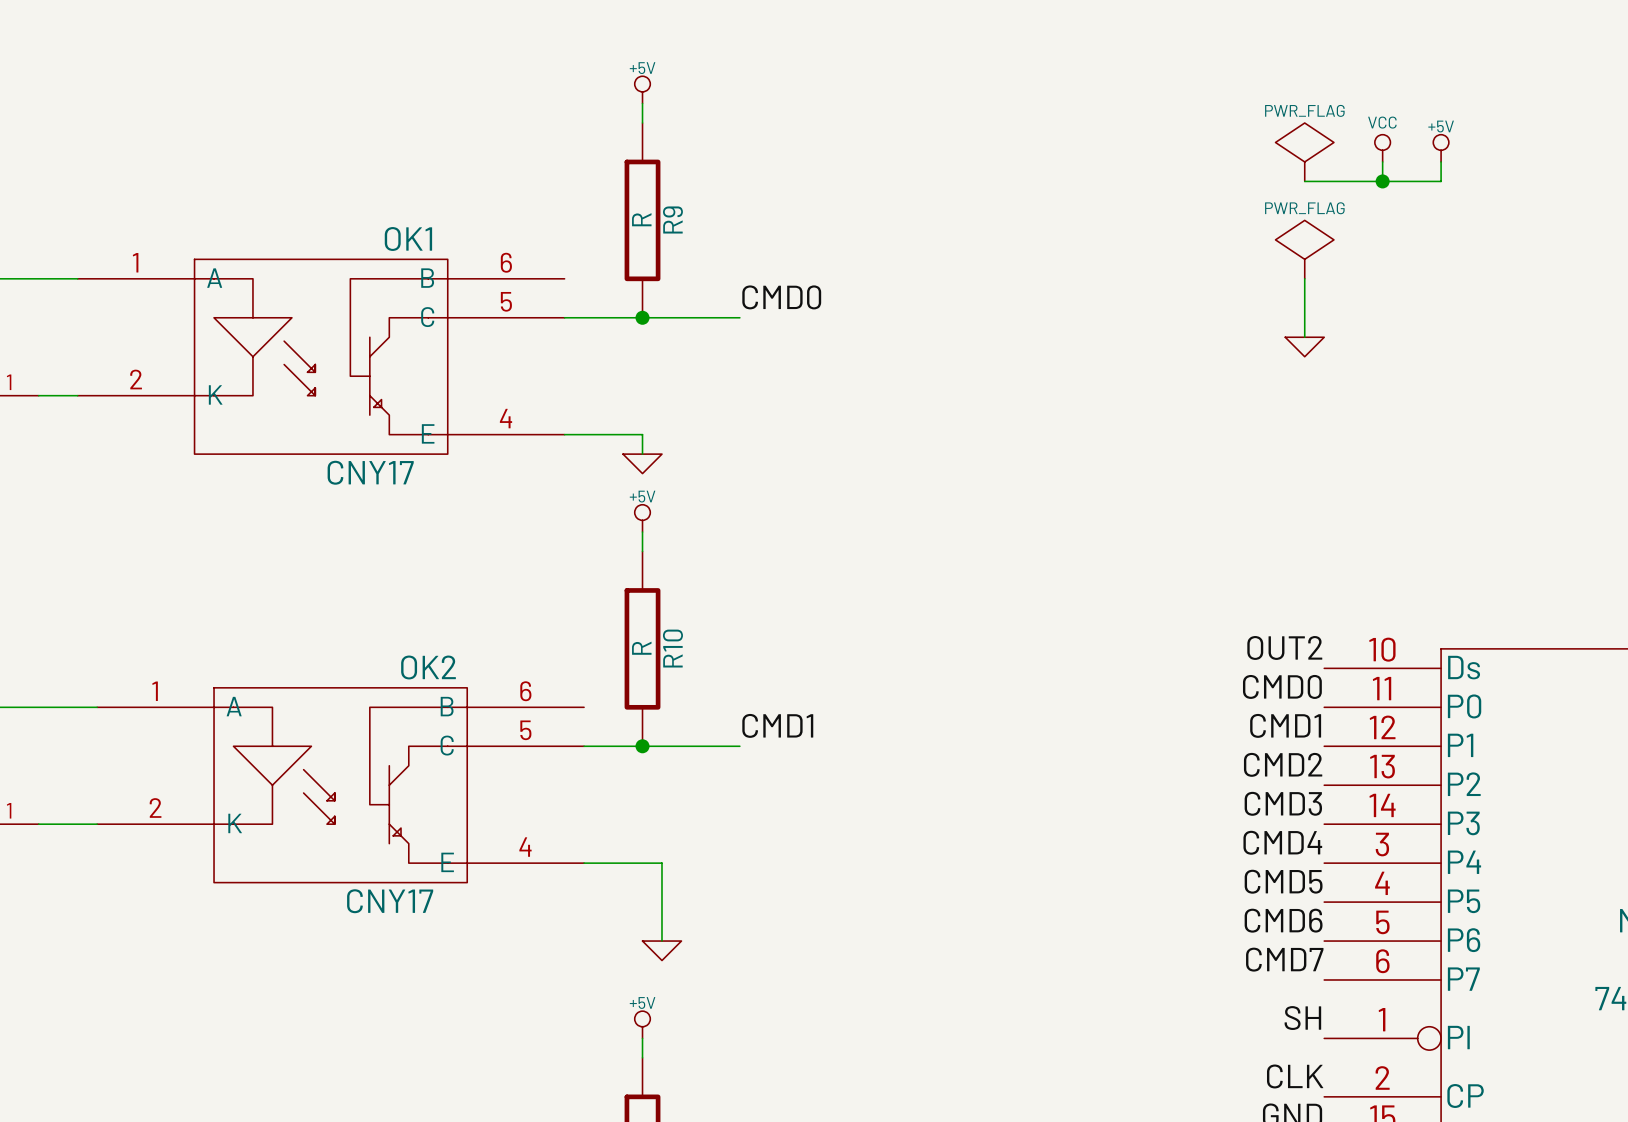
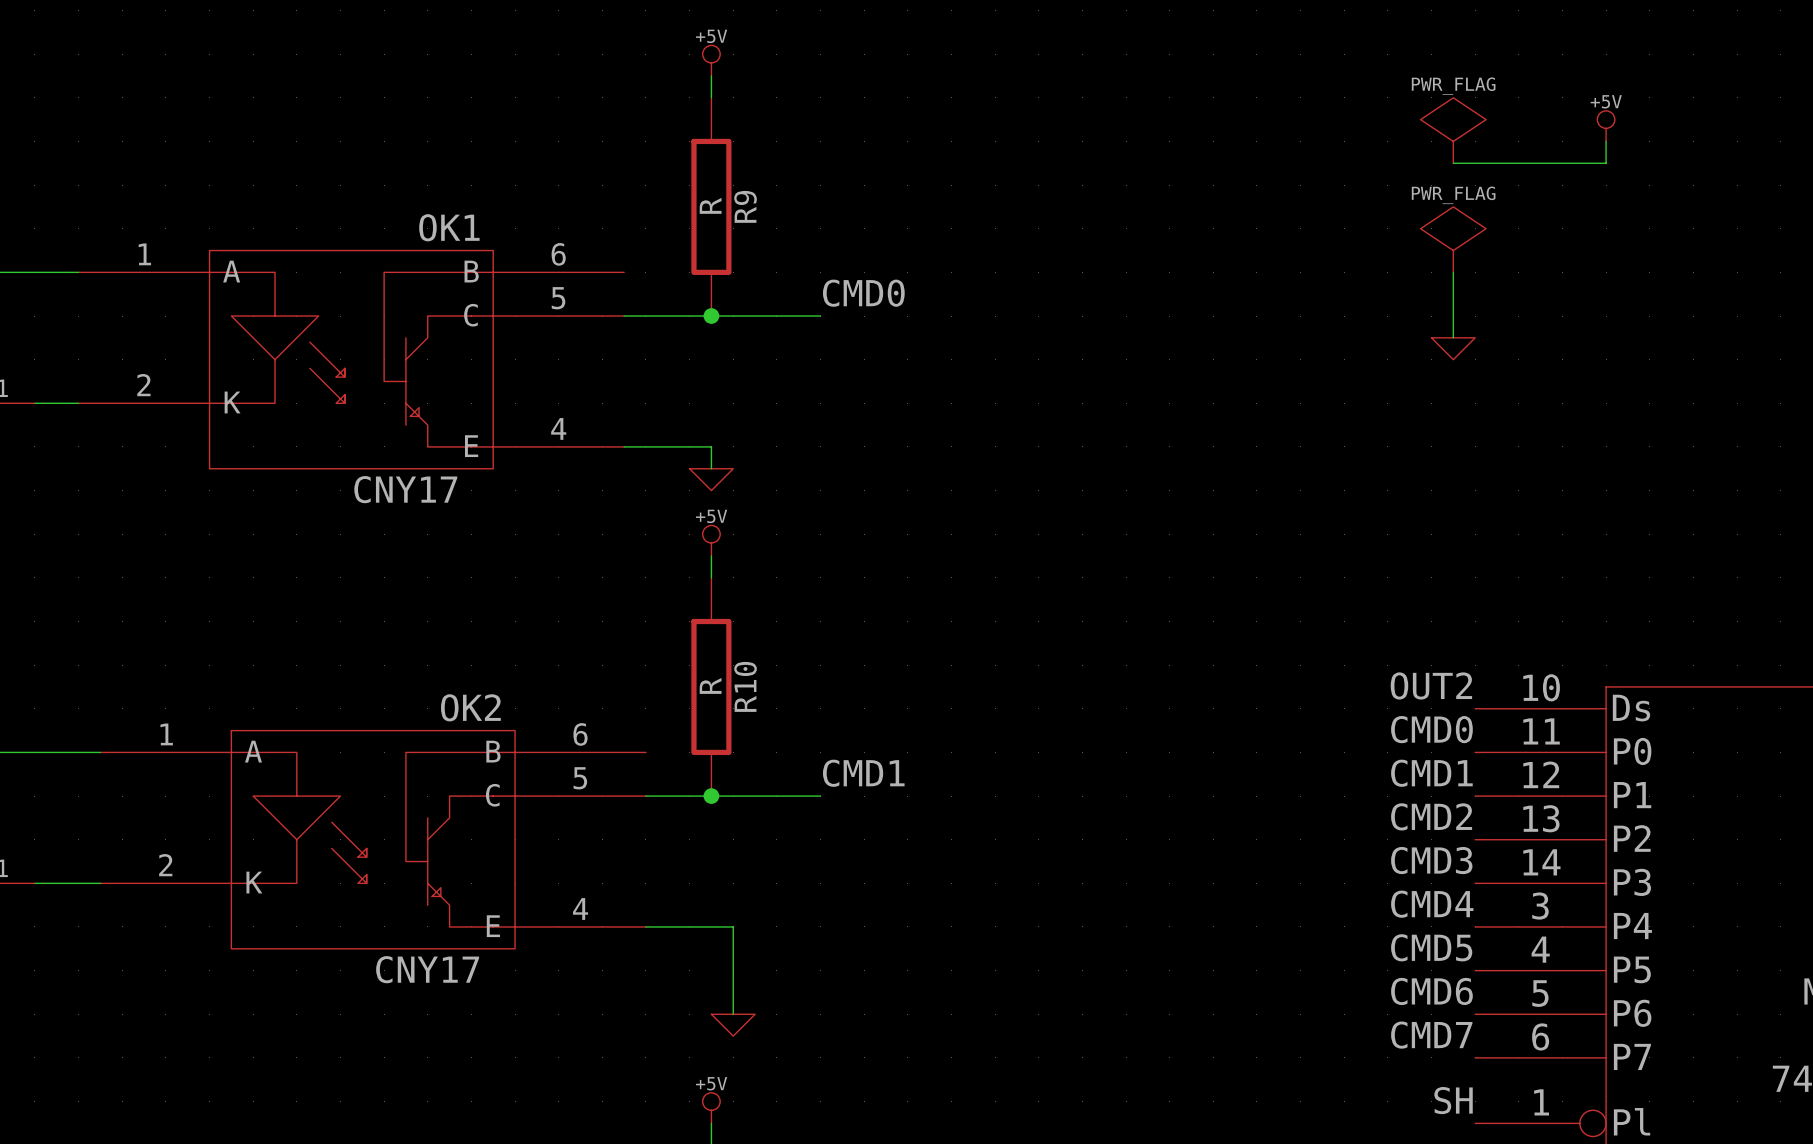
power symbol: VCC (1382, 148) -> none
wire: (1382, 161) (1382, 181) -> none
junction: (1382, 181) -> none

